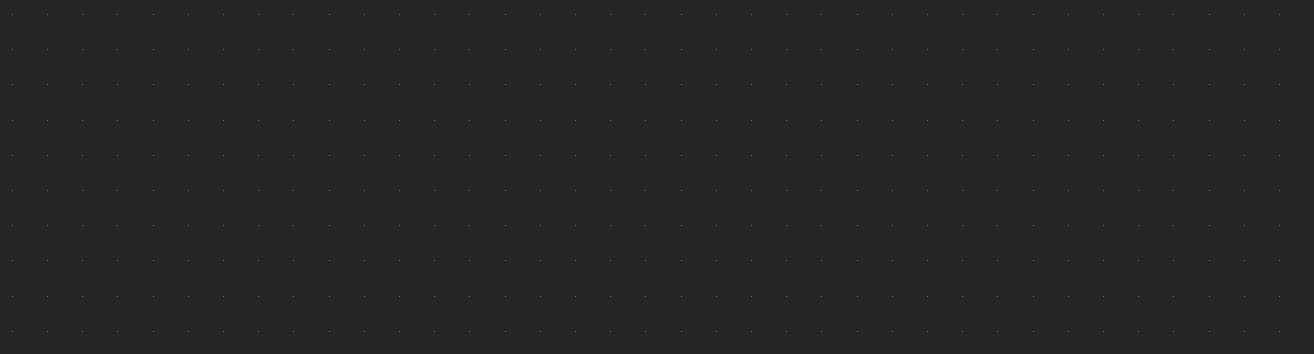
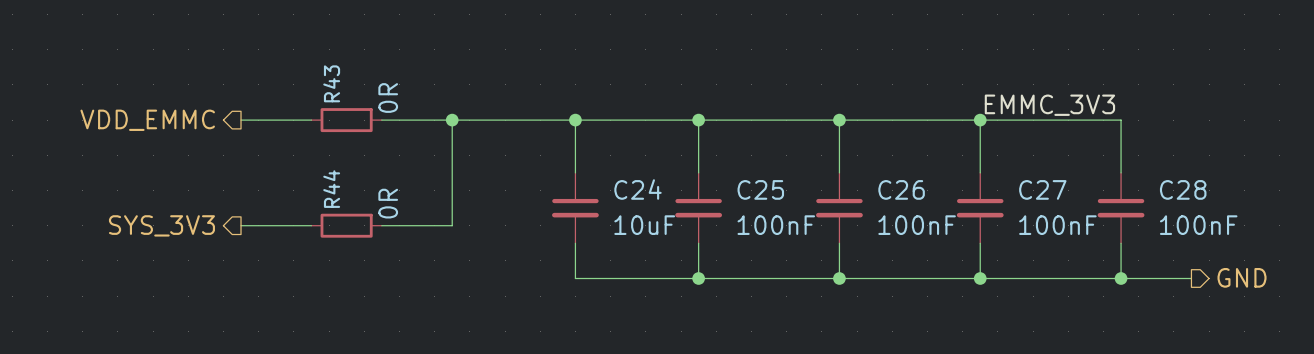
label: none -> EMMC_3V3 (1049, 105)
hierarchical label: none -> VDD_EMMC (147, 120)
wire: none -> (241, 120) (311, 120)
R43: none -> 0R (346, 120)
wire: none -> (381, 120) (1121, 120) (1121, 172)
wire: none -> (452, 120) (452, 225) (381, 225)
junction: none -> (452, 120)
wire: none -> (575, 120) (575, 172)
junction: none -> (575, 120)
wire: none -> (698, 120) (698, 172)
junction: none -> (698, 120)
wire: none -> (839, 120) (839, 172)
junction: none -> (839, 120)
wire: none -> (980, 120) (980, 172)
junction: none -> (980, 120)
C24: none -> 10uF (575, 208)
C25: none -> 100nF (698, 208)
C26: none -> 100nF (839, 208)
C27: none -> 100nF (980, 208)
C28: none -> 100nF (1121, 208)
hierarchical label: none -> SYS_3V3 (161, 225)
wire: none -> (241, 225) (311, 225)
R44: none -> 0R (346, 225)
wire: none -> (575, 243) (575, 278) (1191, 278)
wire: none -> (698, 243) (698, 278)
wire: none -> (839, 243) (839, 278)
wire: none -> (980, 243) (980, 278)
wire: none -> (1121, 243) (1121, 278)
hierarchical label: none -> GND (1242, 277)
junction: none -> (698, 278)
junction: none -> (839, 278)
junction: none -> (980, 278)
junction: none -> (1121, 278)

